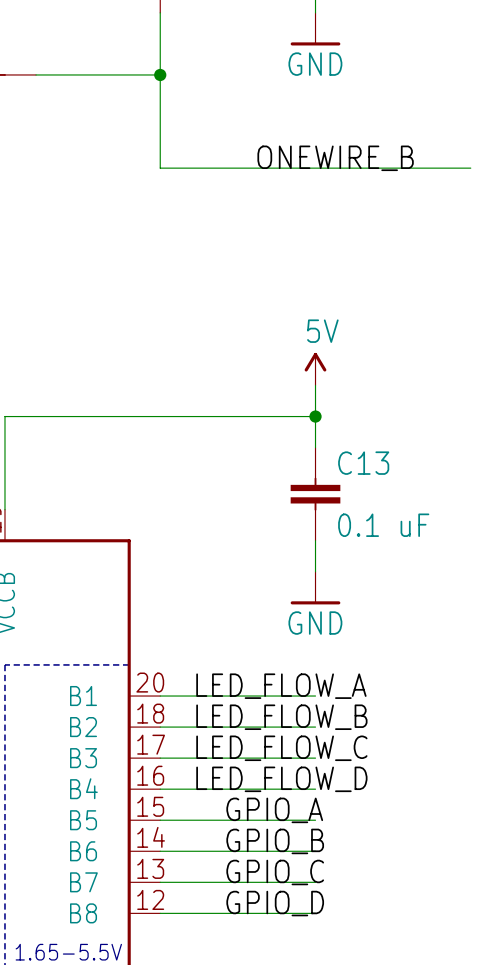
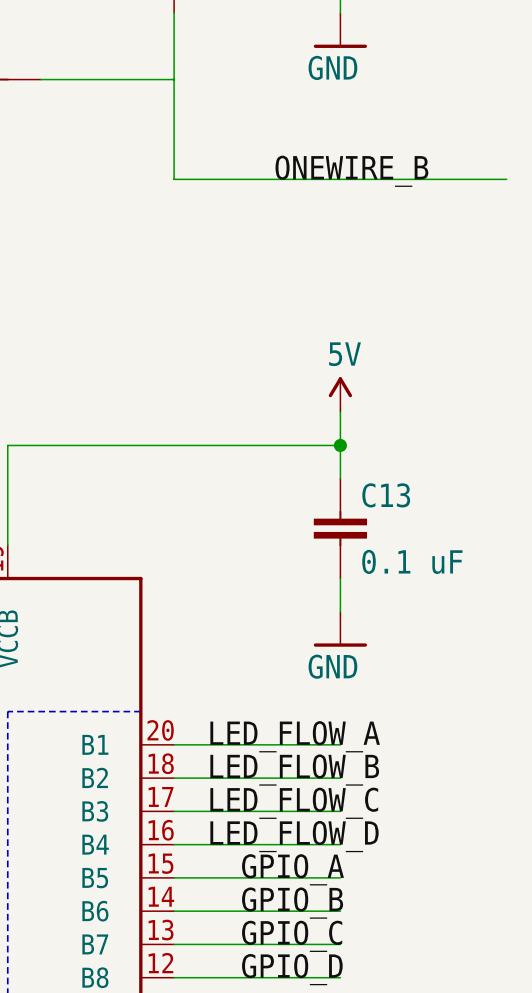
junction: (160, 74) -> none

